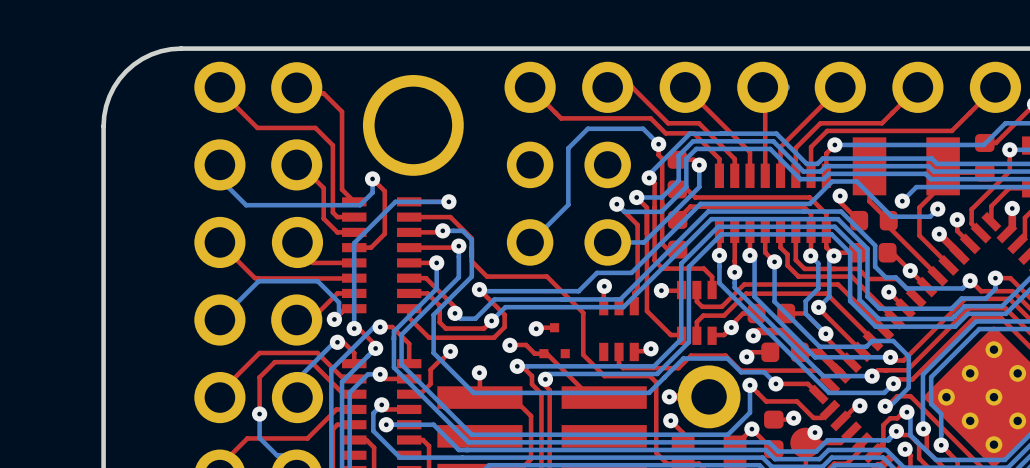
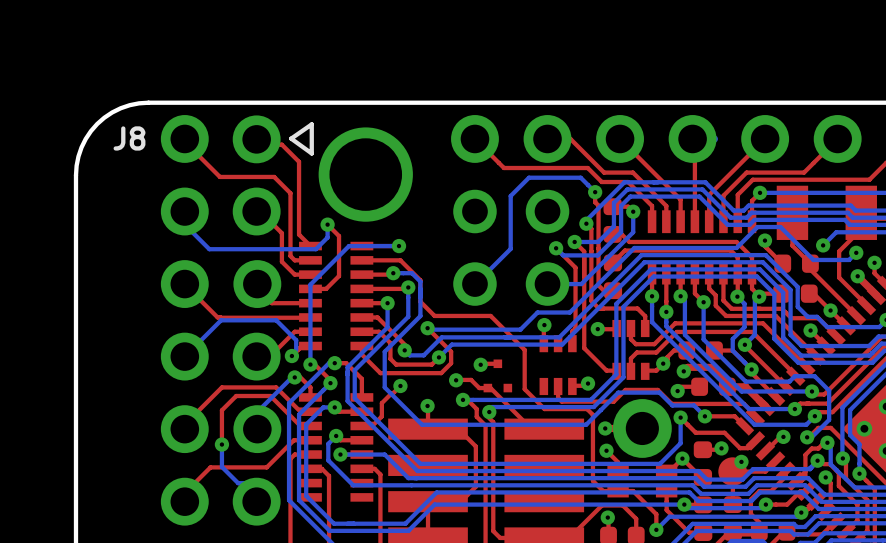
line: none -> (311, 124) (311, 153) (291, 138) (311, 124)
text: none -> J8 (129, 138)

